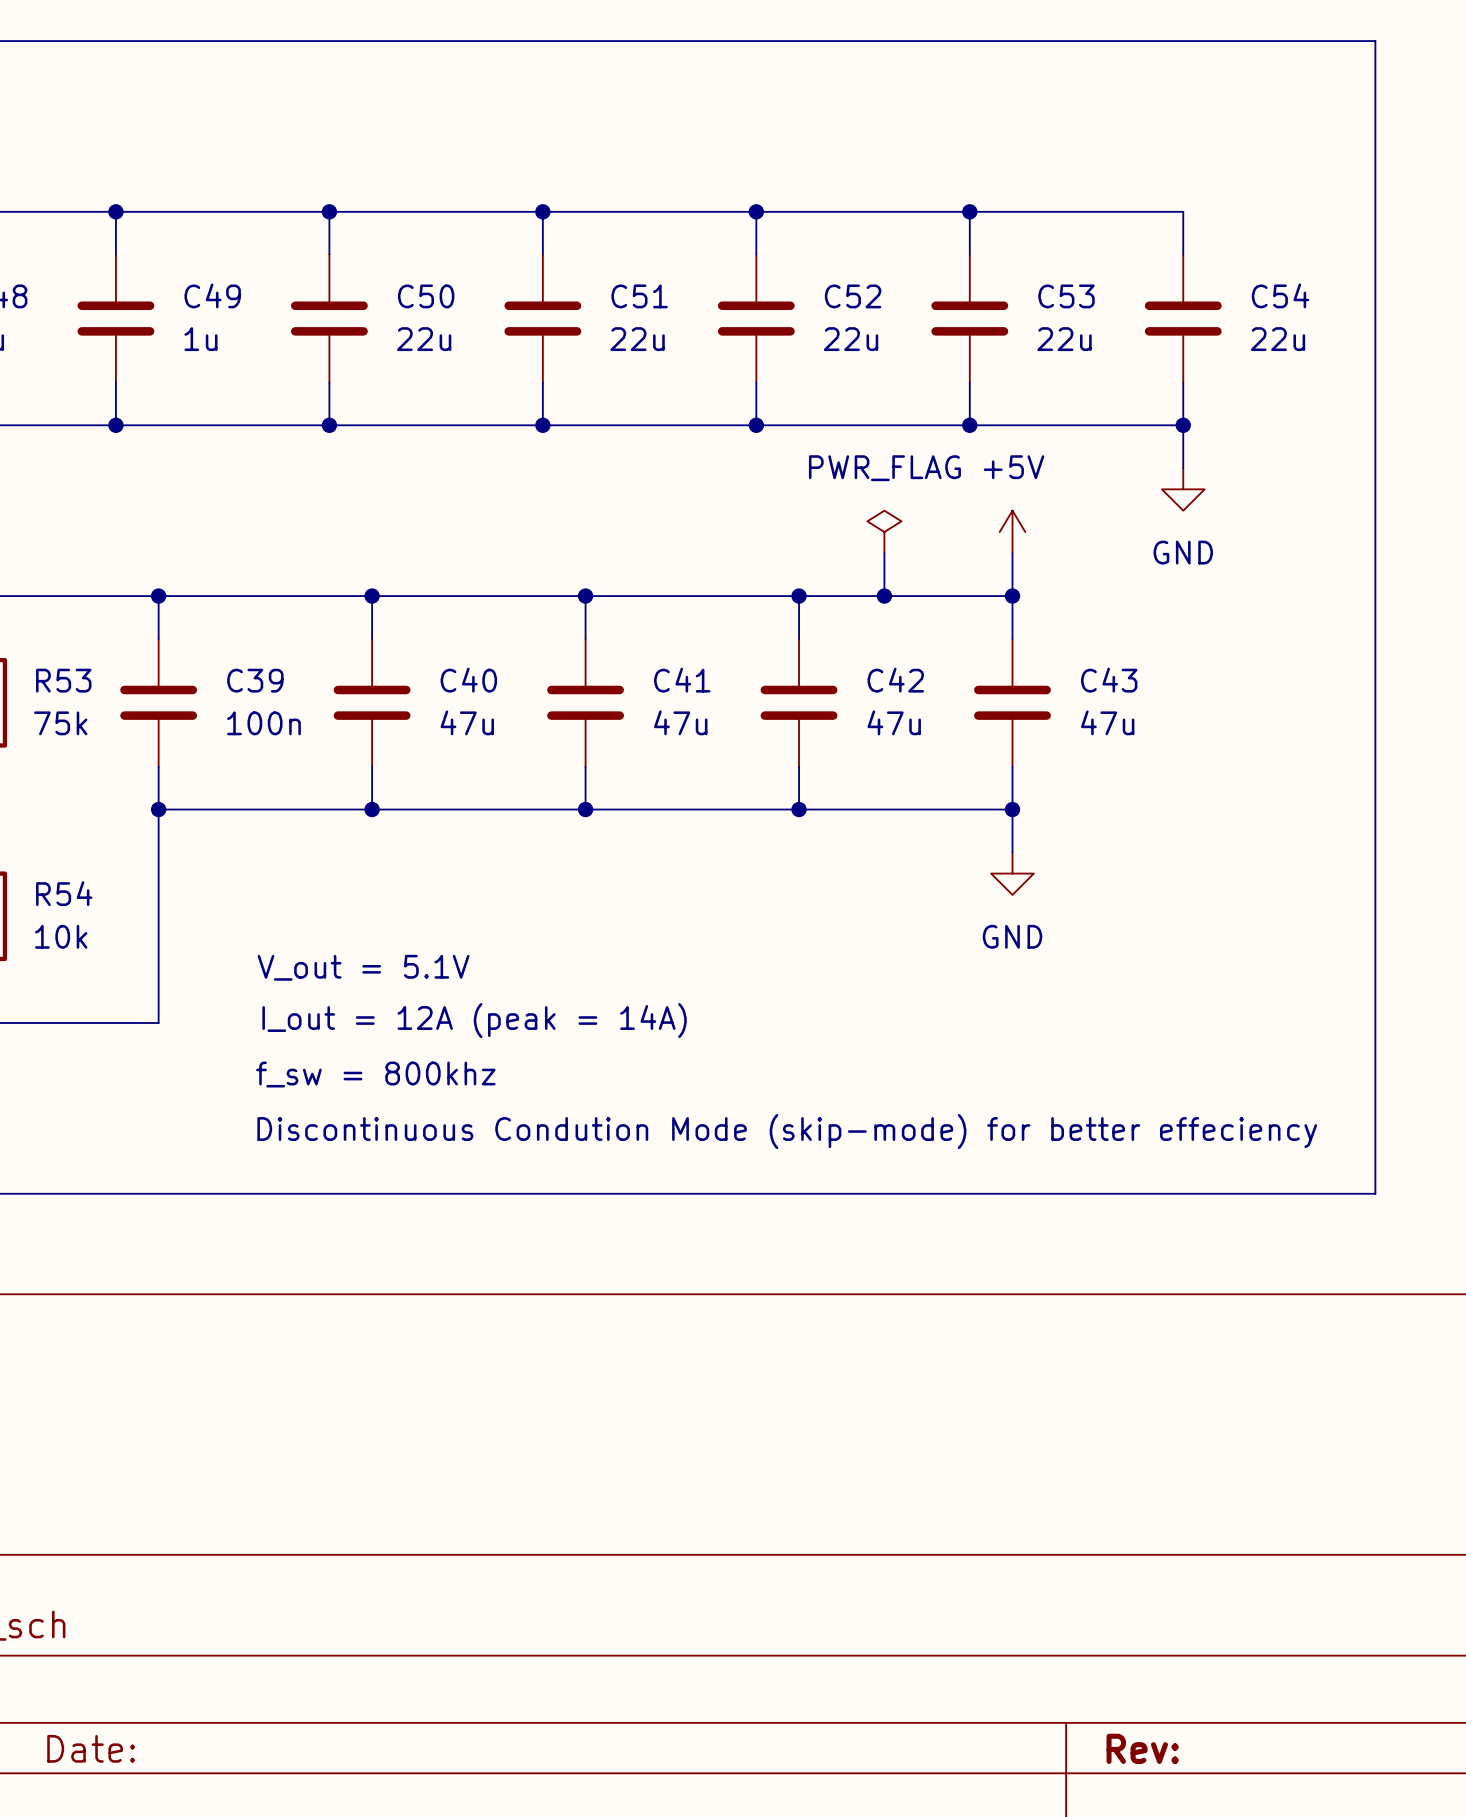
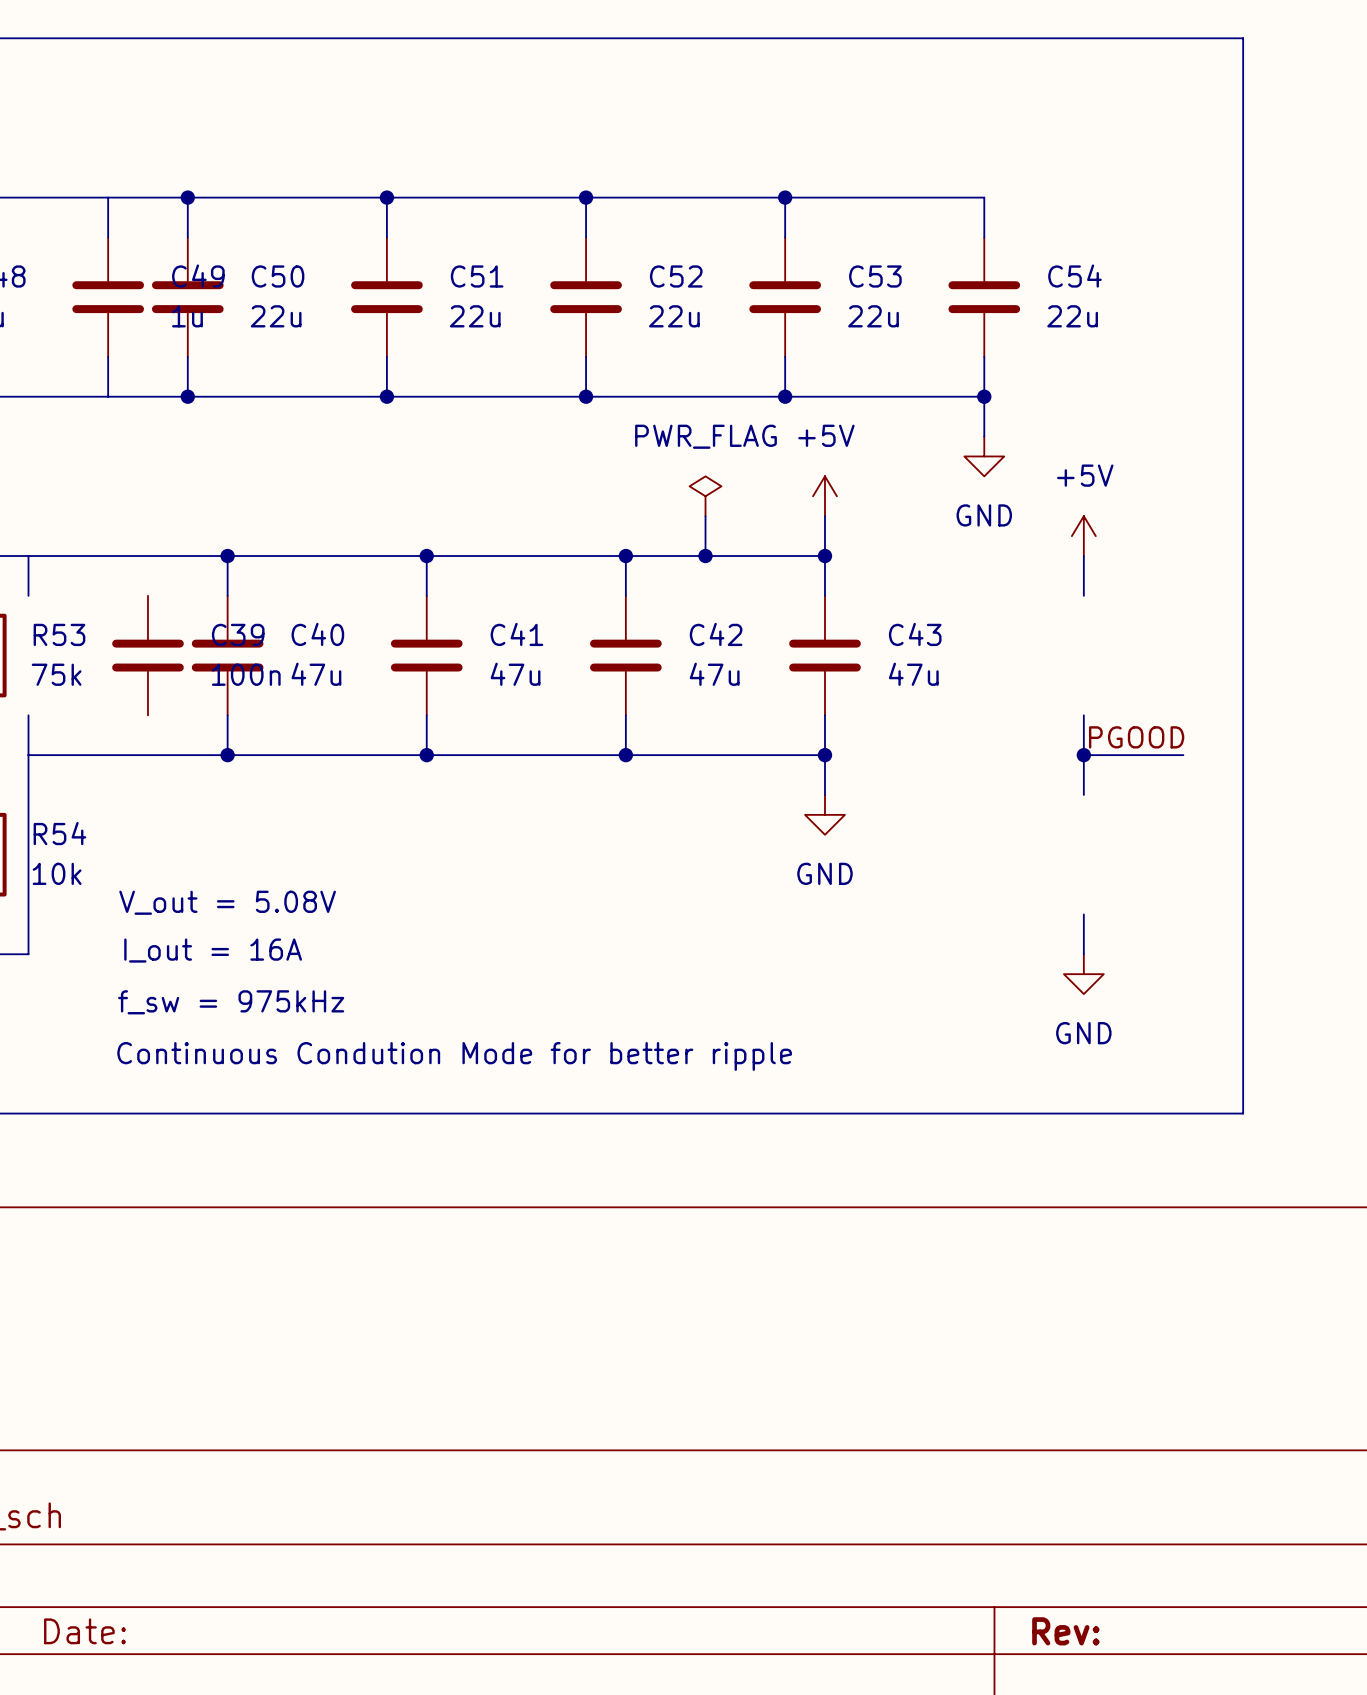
line: (1332, 41) (1375, 41) (1375, 1193) (1332, 1193) -> (1243, 38) (1243, 1113)
junction: (115, 211) -> none
junction: none -> (187, 197)
wire: (329, 211) (329, 254) -> (187, 197) (187, 237)
junction: (329, 211) -> none
junction: none -> (386, 197)
wire: (542, 211) (542, 254) -> (386, 197) (386, 237)
junction: (542, 211) -> none
junction: none -> (586, 197)
wire: (756, 211) (756, 254) -> (586, 197) (586, 237)
junction: (756, 211) -> none
junction: none -> (785, 197)
wire: (969, 211) (969, 254) -> (785, 197) (785, 237)
junction: (969, 211) -> none
wire: (1055, 211) (1183, 211) (1183, 254) -> (984, 197) (984, 237)
C50 position: (329, 318) -> (187, 297)
C51 position: (542, 318) -> (386, 297)
C52 position: (756, 318) -> (586, 297)
C53 position: (969, 318) -> (785, 297)
C54 position: (1183, 318) -> (984, 297)
wire: (329, 382) (329, 425) -> (187, 356) (187, 396)
wire: (542, 382) (542, 425) -> (386, 356) (386, 396)
wire: (756, 382) (756, 425) -> (586, 356) (586, 396)
wire: (969, 382) (969, 425) -> (785, 356) (785, 396)
wire: (1183, 382) (1183, 467) -> (984, 356) (984, 436)
junction: (115, 425) -> none
junction: none -> (187, 396)
junction: (329, 425) -> none
junction: none -> (386, 396)
junction: (542, 425) -> none
junction: none -> (586, 396)
junction: (756, 425) -> none
junction: none -> (785, 396)
junction: (969, 425) -> none
wire: (1055, 425) (1183, 425) -> none
junction: none -> (984, 396)
junction: (1183, 425) -> none
power symbol position: GND (1183, 489) -> GND (984, 456)
power symbol: none -> PWR_FLAG (705, 496)
power symbol: PWR_FLAG (884, 532) -> +5V (824, 496)
power symbol position: +5V (1012, 532) -> +5V (1083, 536)
wire: none -> (705, 516) (705, 556)
wire: (1012, 553) (1012, 638) -> (1083, 715) (1083, 794)
wire: (158, 596) (158, 638) -> (28, 556) (28, 595)
junction: (158, 596) -> none
junction: none -> (227, 556)
wire: (372, 596) (372, 638) -> (227, 556) (227, 595)
junction: (372, 596) -> none
junction: none -> (426, 556)
wire: (585, 596) (585, 638) -> (426, 556) (426, 595)
junction: (585, 596) -> none
junction: none -> (625, 556)
wire: (799, 596) (799, 638) -> (625, 556) (625, 595)
junction position: (799, 596) -> (705, 556)
wire: (884, 596) (1012, 596) -> (824, 556) (824, 595)
junction: (1012, 596) -> none
wire: none -> (1083, 556) (1083, 595)
C40 position: (372, 702) -> (227, 655)
C41 position: (585, 702) -> (426, 655)
C42 position: (799, 702) -> (625, 655)
C43 position: (1012, 702) -> (824, 655)
wire: (158, 766) (158, 1022) (30, 1022) -> (28, 715) (28, 954)
wire: (372, 766) (372, 809) -> (227, 715) (227, 755)
wire: (585, 766) (585, 809) -> (426, 715) (426, 755)
wire: (799, 766) (799, 809) -> (625, 715) (625, 755)
wire: (1012, 766) (1012, 852) -> (824, 715) (824, 794)
label: none -> PGOOD (1136, 737)
wire: none -> (28, 755) (147, 755)
junction: (158, 809) -> none
junction: none -> (227, 755)
junction: (372, 809) -> none
junction: none -> (426, 755)
junction: (585, 809) -> none
junction: none -> (625, 755)
junction: (799, 809) -> none
wire: (884, 809) (1012, 809) -> none
junction: none -> (824, 755)
junction: (1012, 809) -> none
wire: none -> (1083, 755) (1183, 755)
junction: none -> (1083, 755)
power symbol: none -> GND (824, 814)
power symbol: GND (1012, 873) -> none
text: V_out = 5.1V (363, 967) -> V_out = 5.08V (227, 902)
wire: none -> (1083, 914) (1083, 954)
text: none -> I_out = 16A (213, 950)
text: I_out = 12A (peak = 14A) (474, 1020) -> none
power symbol: none -> GND (1083, 974)
text: f_sw = 800khz (375, 1074) -> f_sw = 975kHz (231, 1002)
text: Discontinuous Condution Mode (skip-mode) for better effeciency (787, 1131) -> Continuous Condution Mode for better ripple (454, 1056)

